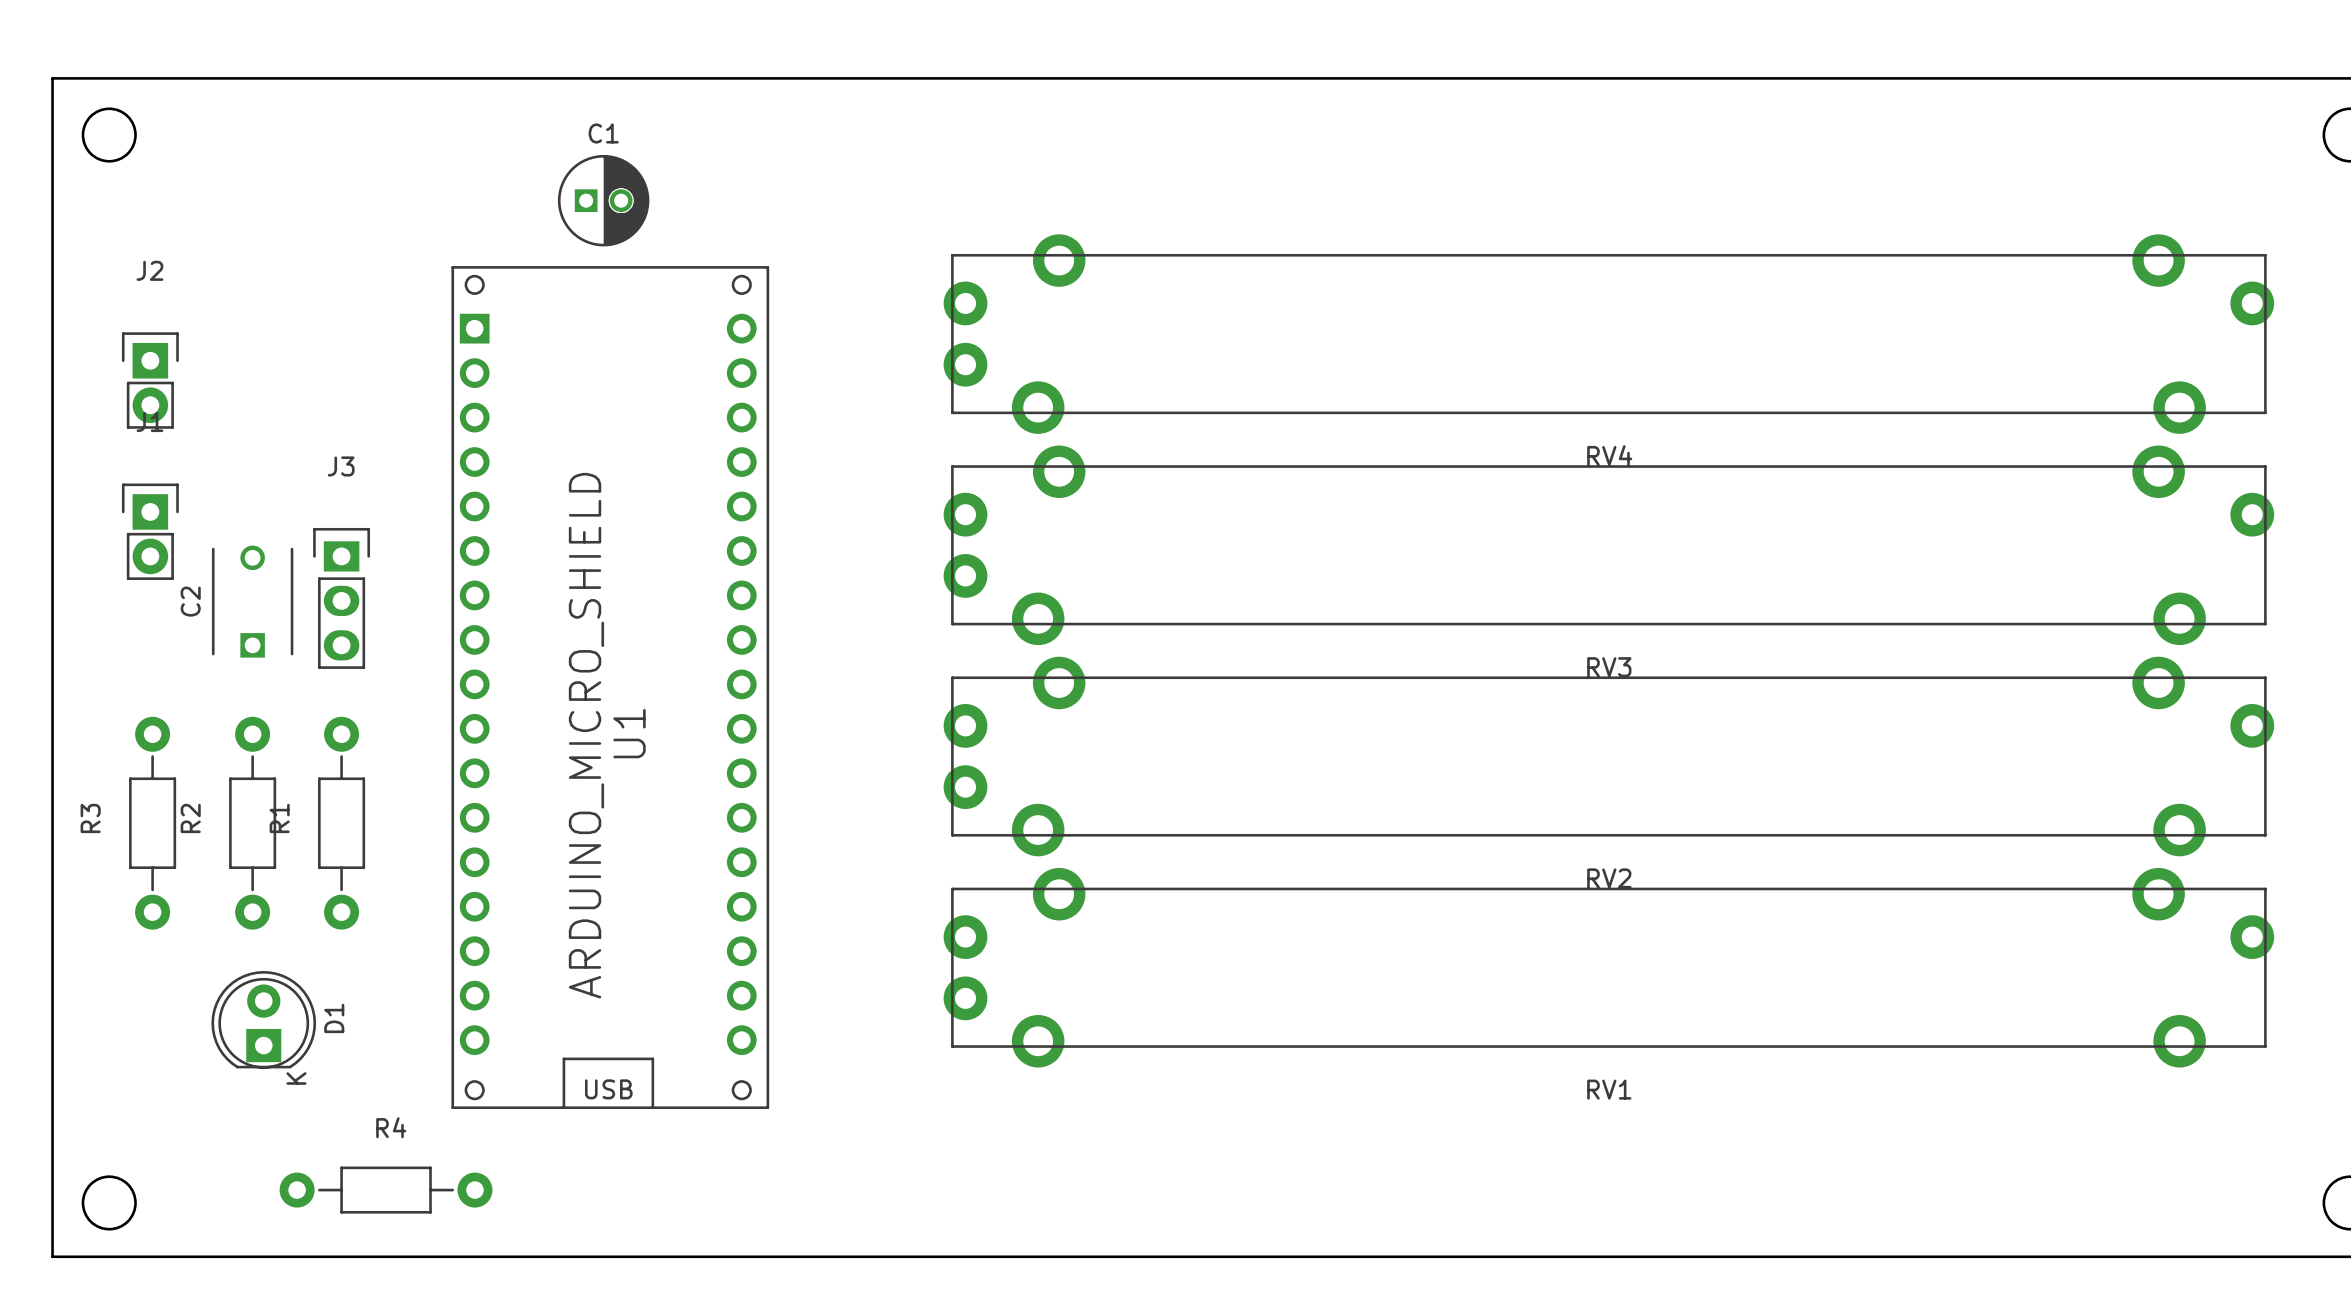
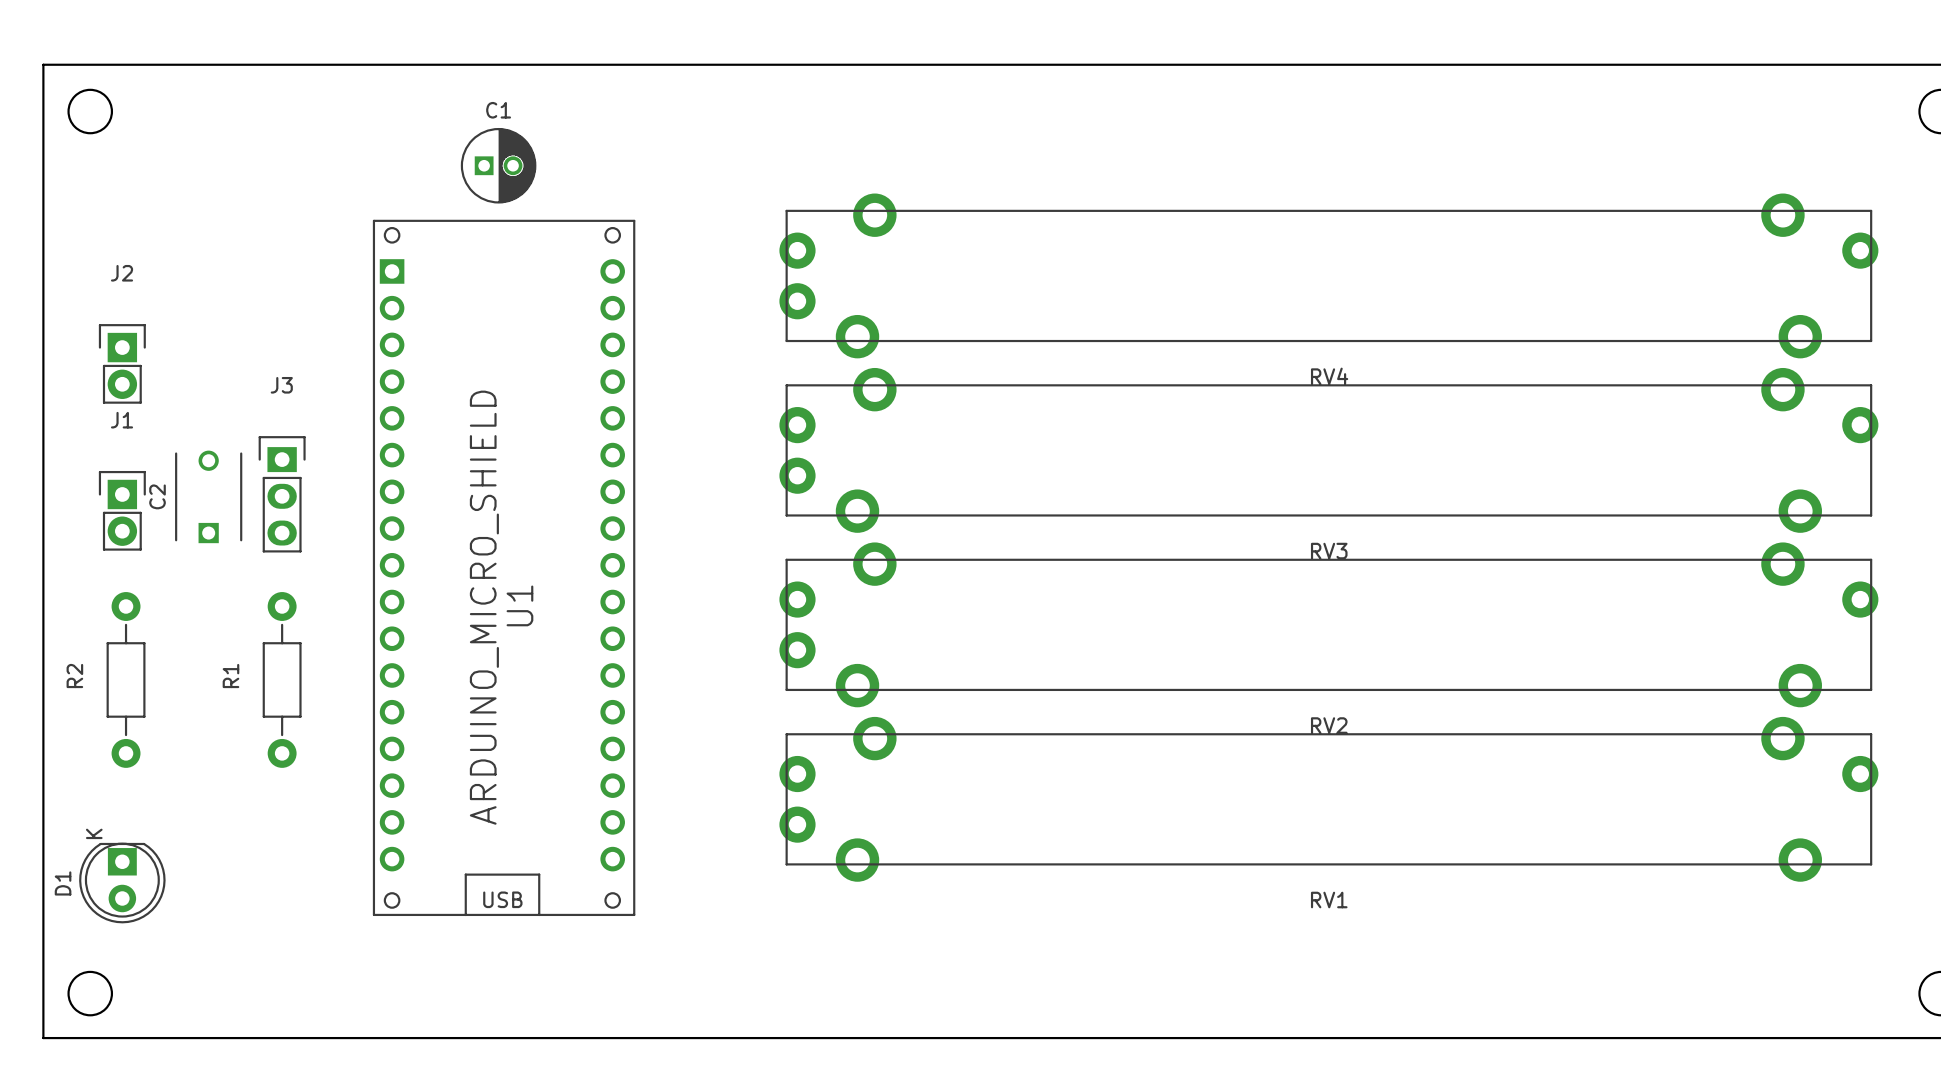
J2 position: (150, 380) -> (122, 363)
J1 position: (150, 531) -> (122, 510)
R3 name: R3 (90, 818) -> R2 (74, 676)
R2: (252, 823) -> none
D1 rotation: 0° (263, 1019) -> 180° (122, 883)
D1 position: (263, 1019) -> (122, 883)
R4: (386, 1190) -> none

